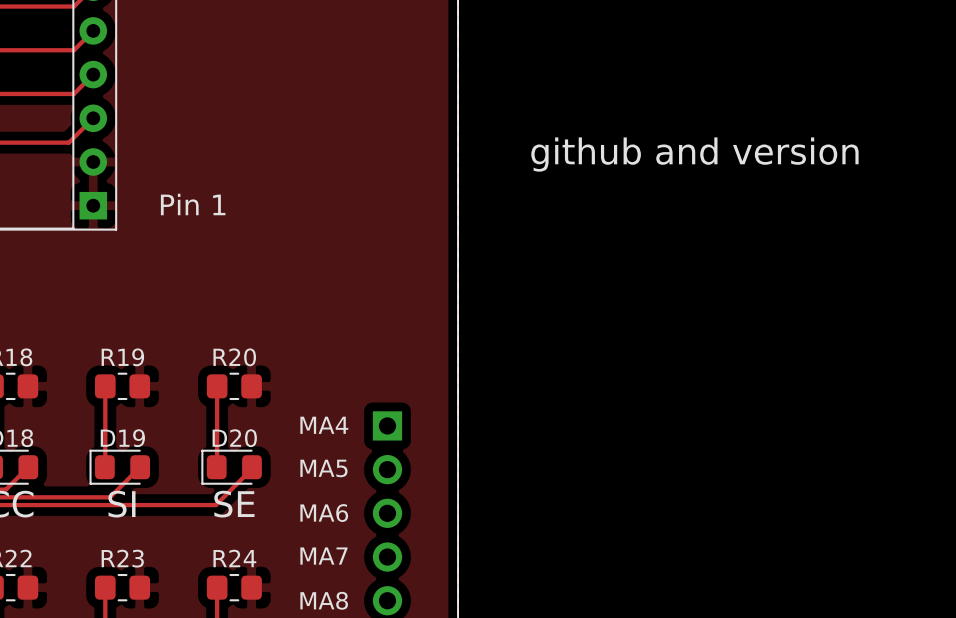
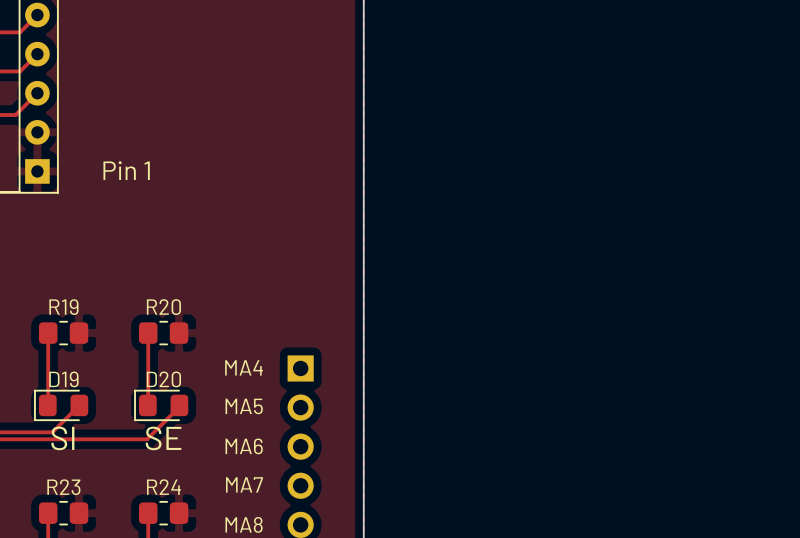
text: github and version (694, 154) -> none

